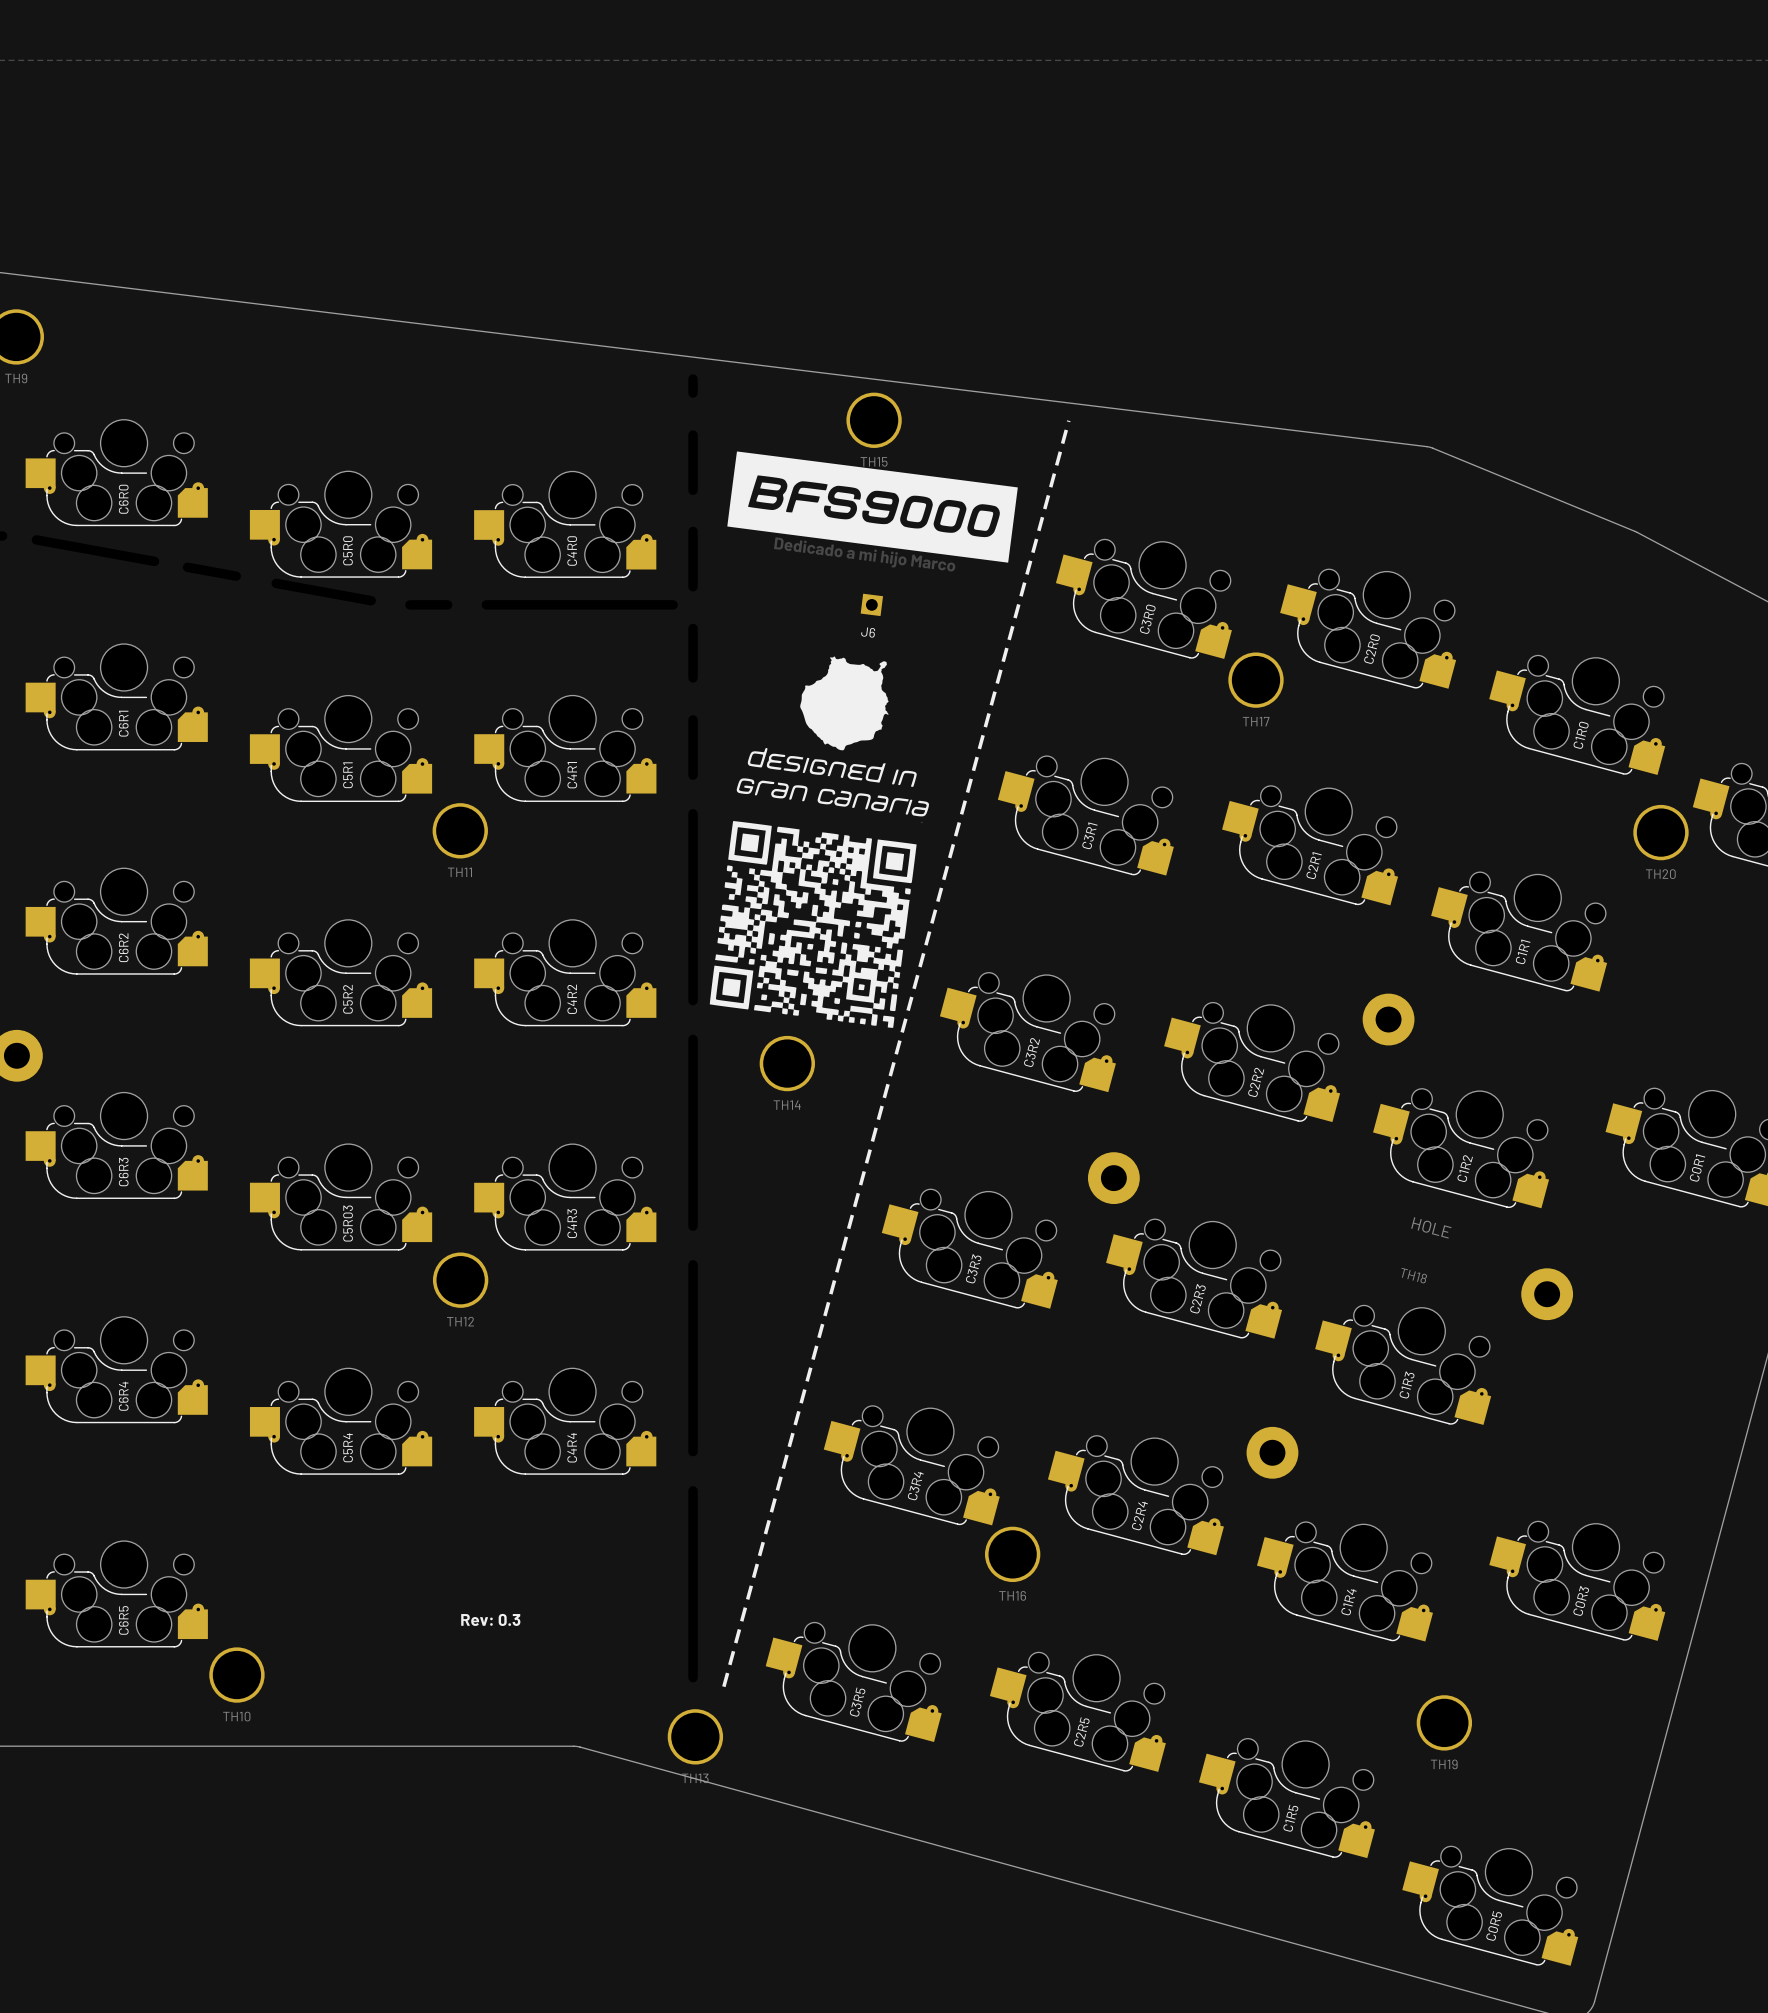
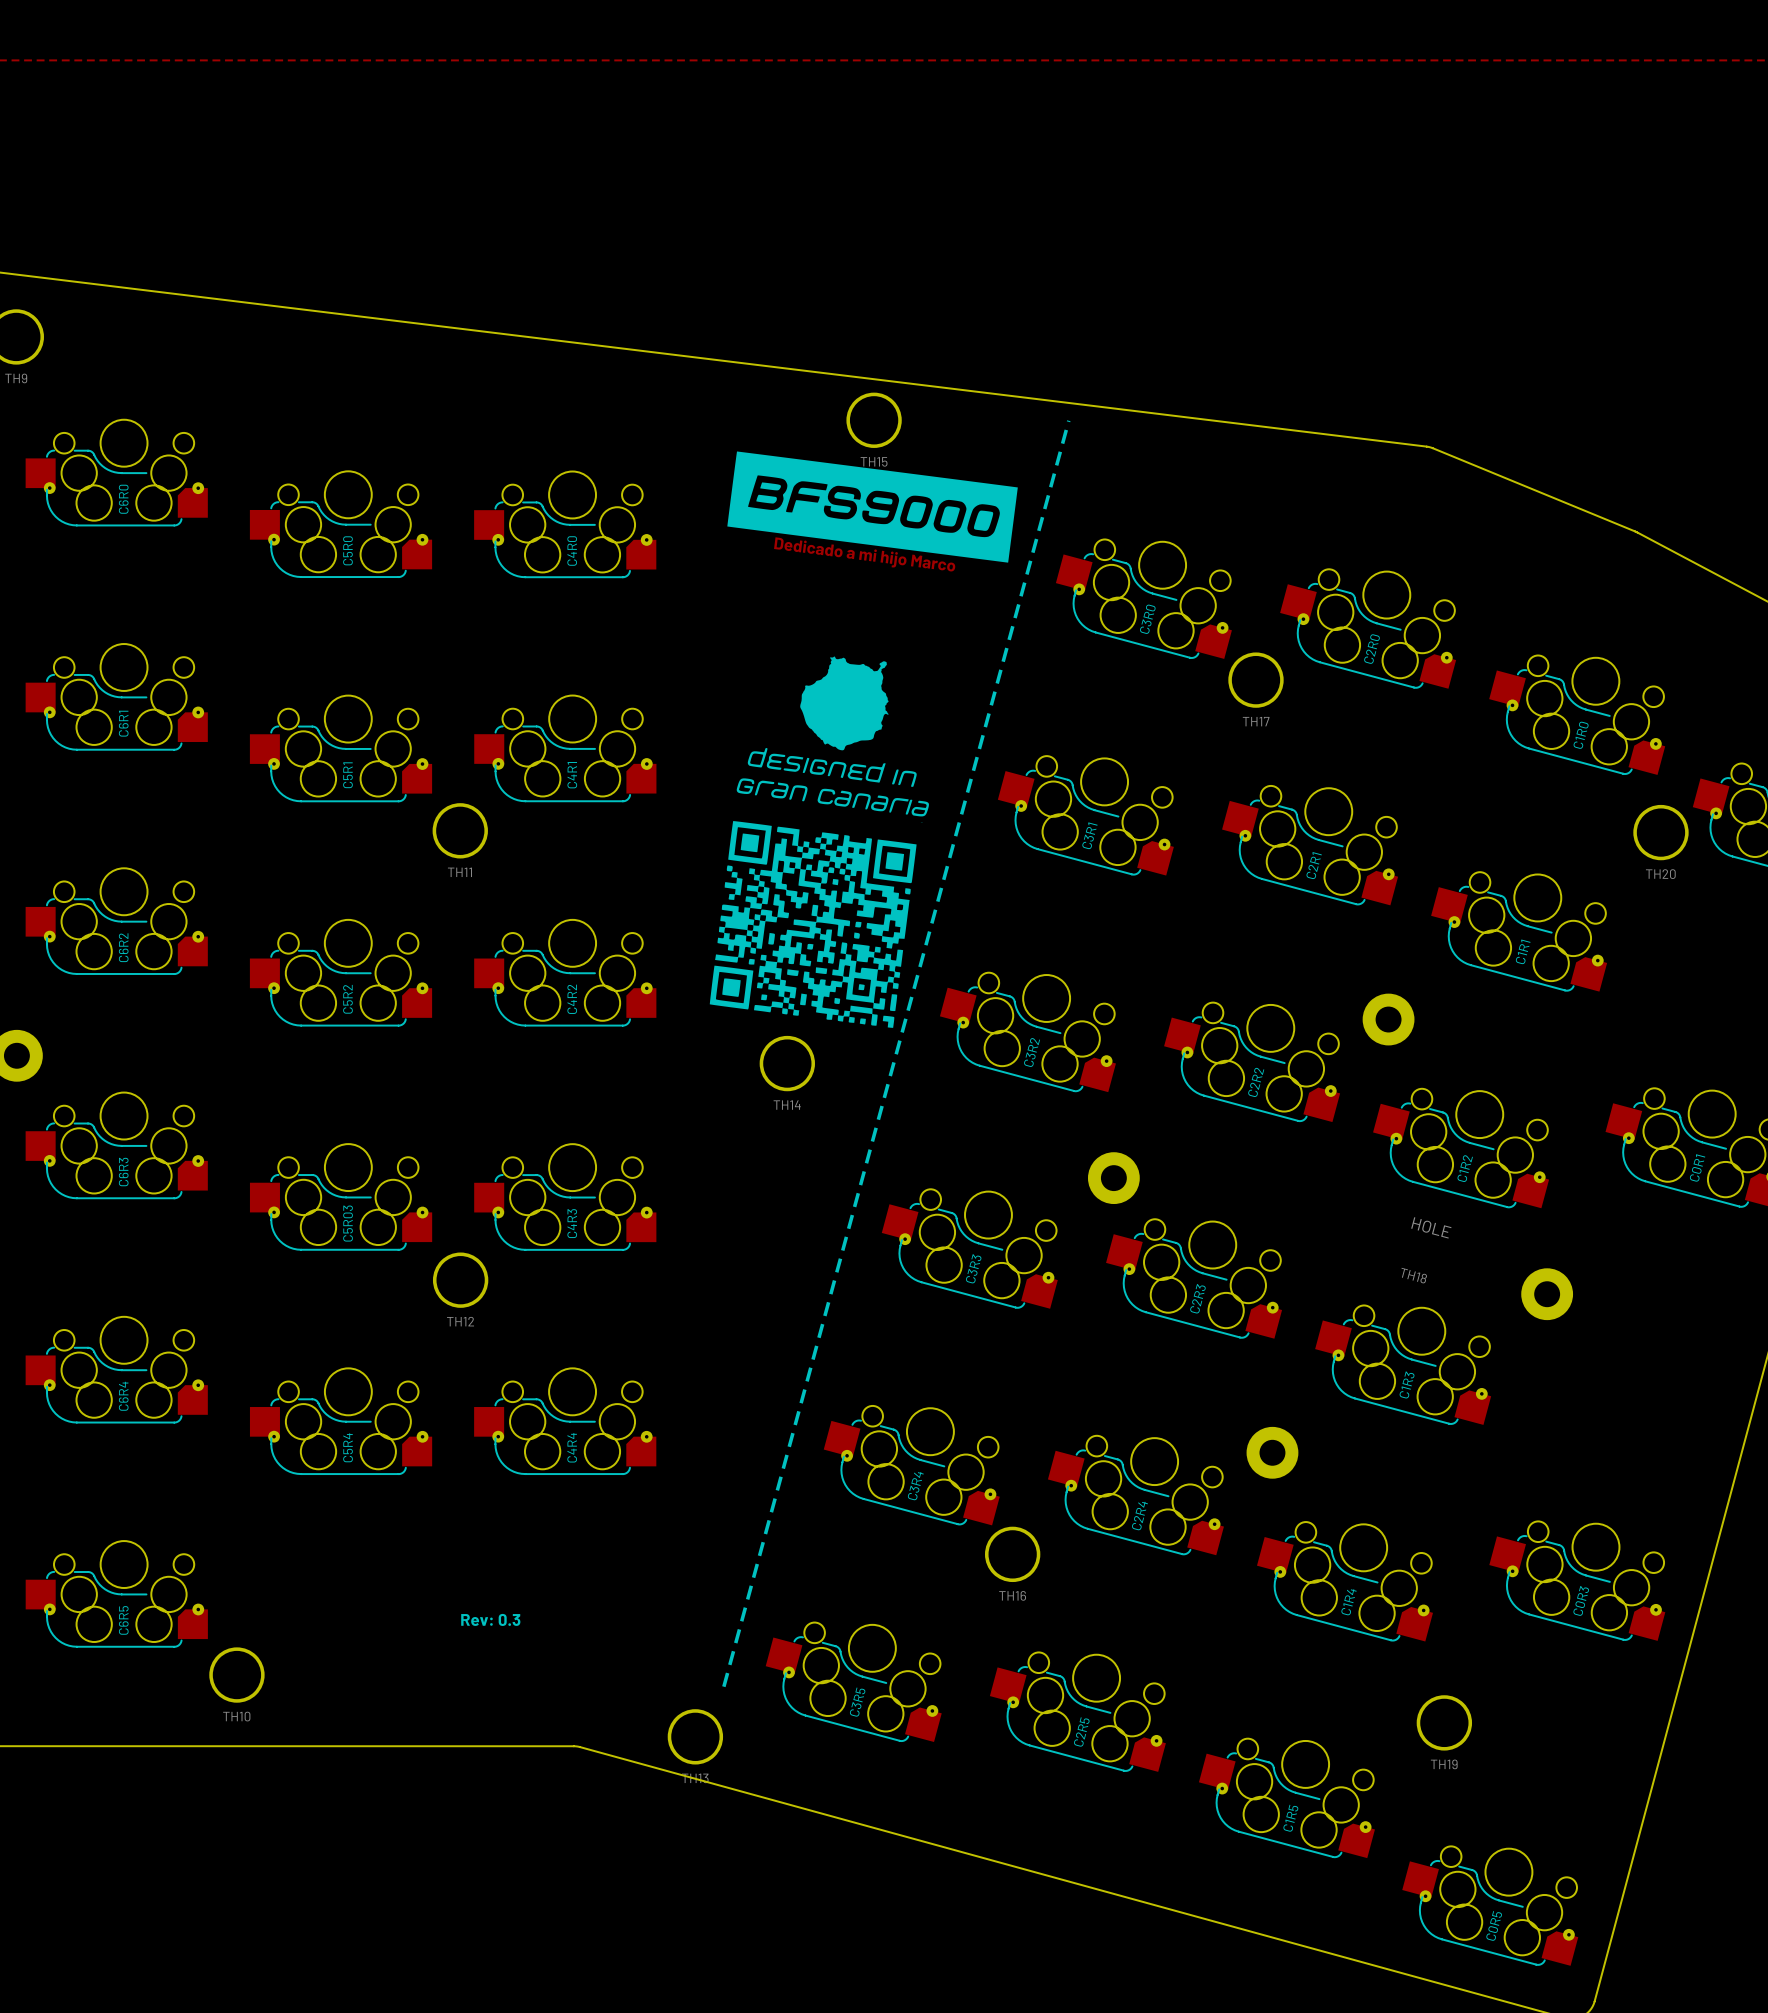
J6: (871, 604) -> none

